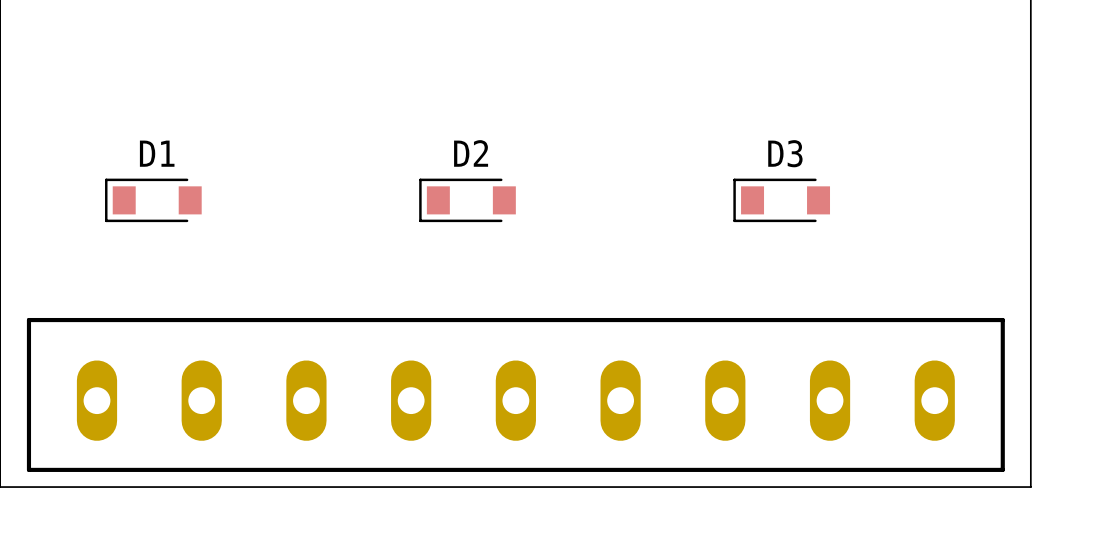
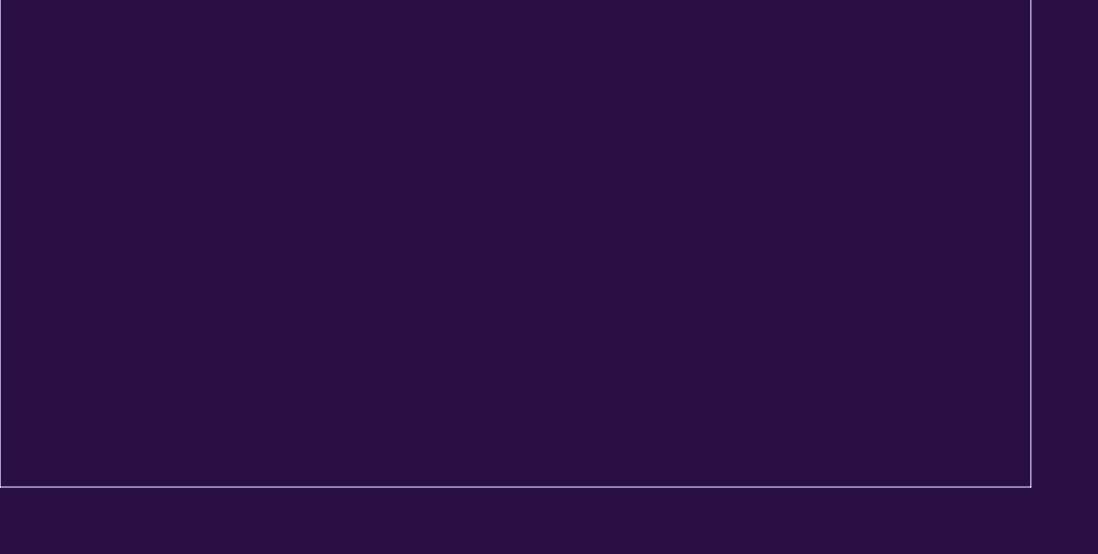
D1: (153, 200) -> none
D2: (467, 200) -> none
D3: (781, 200) -> none
part: (515, 394) -> none

